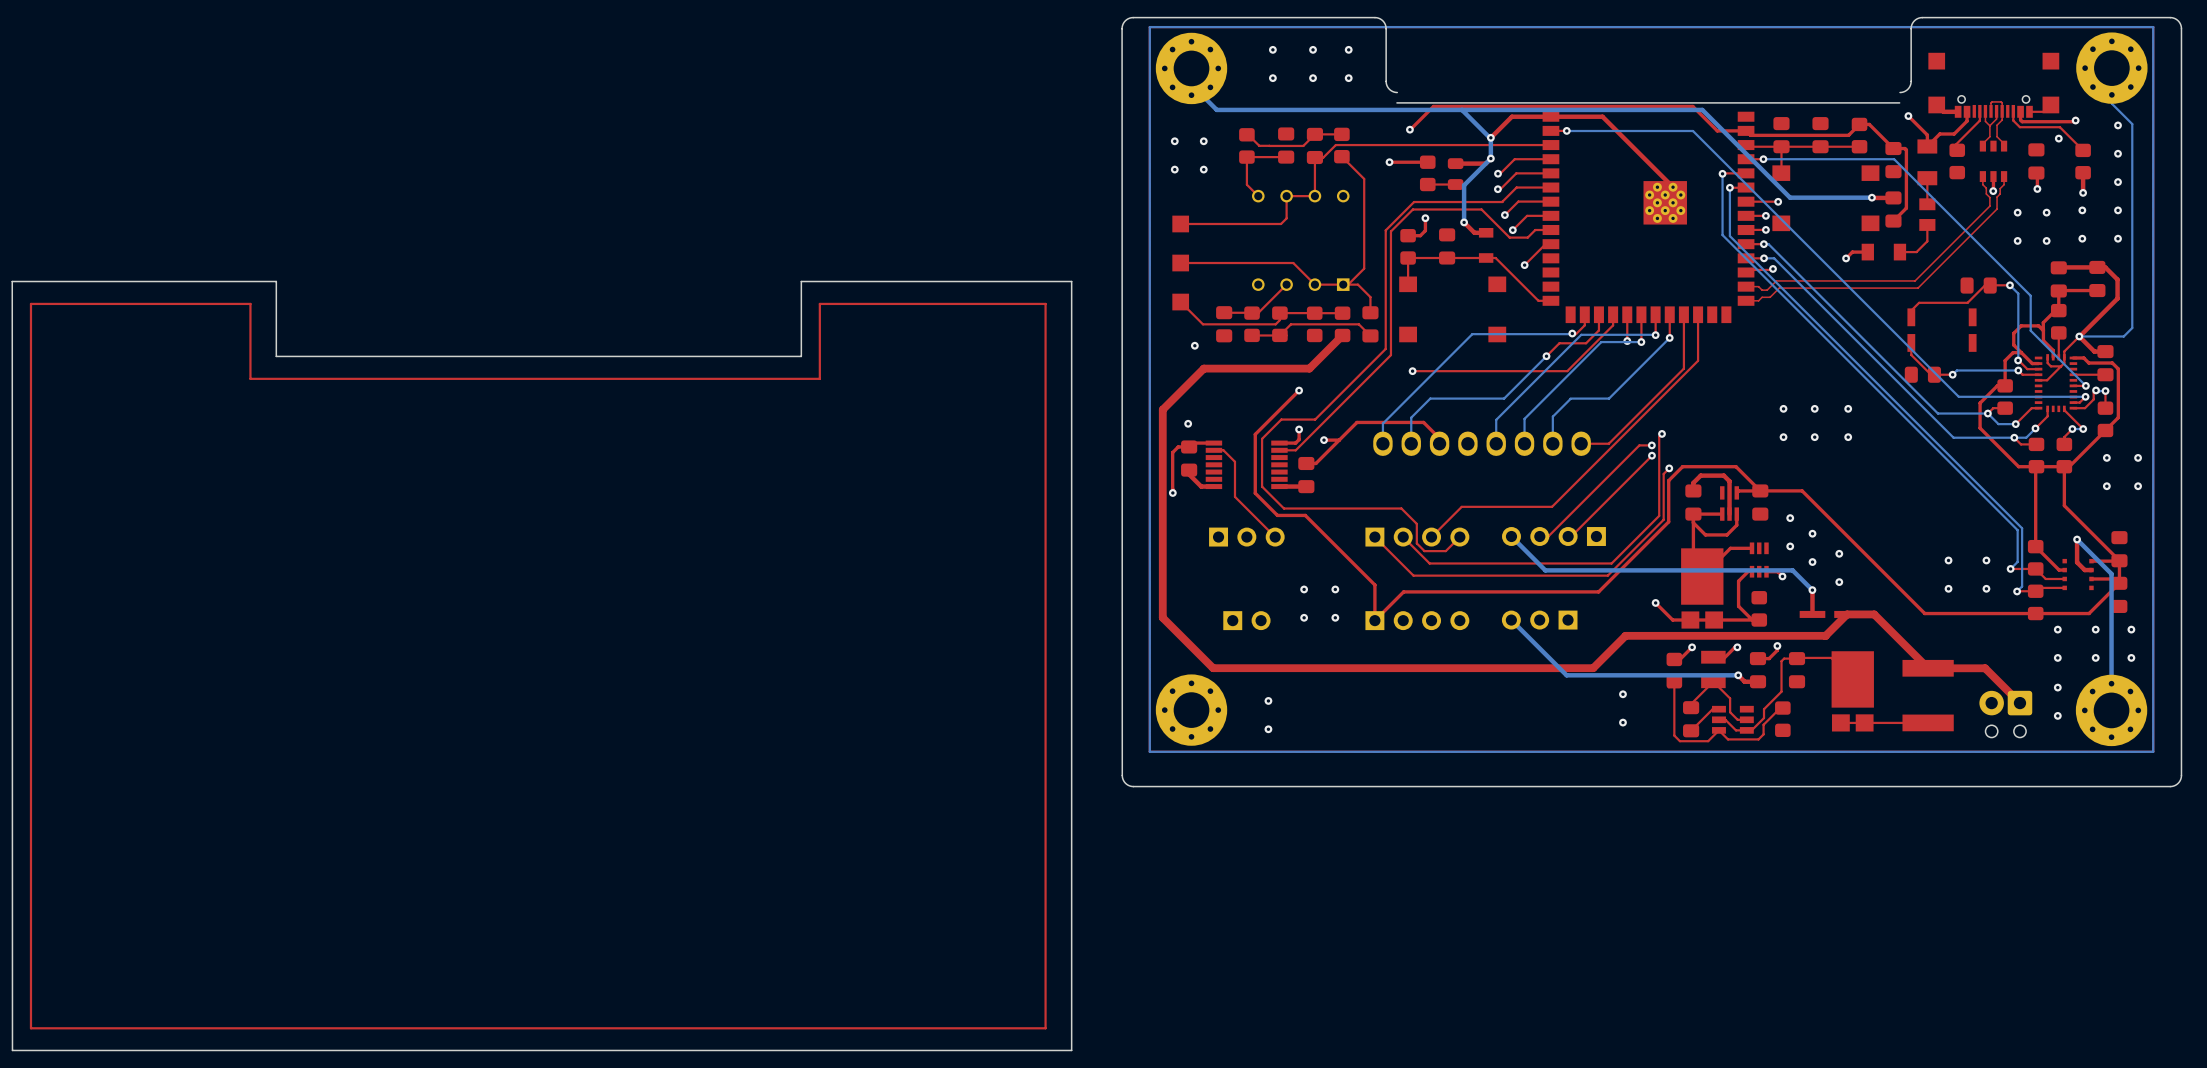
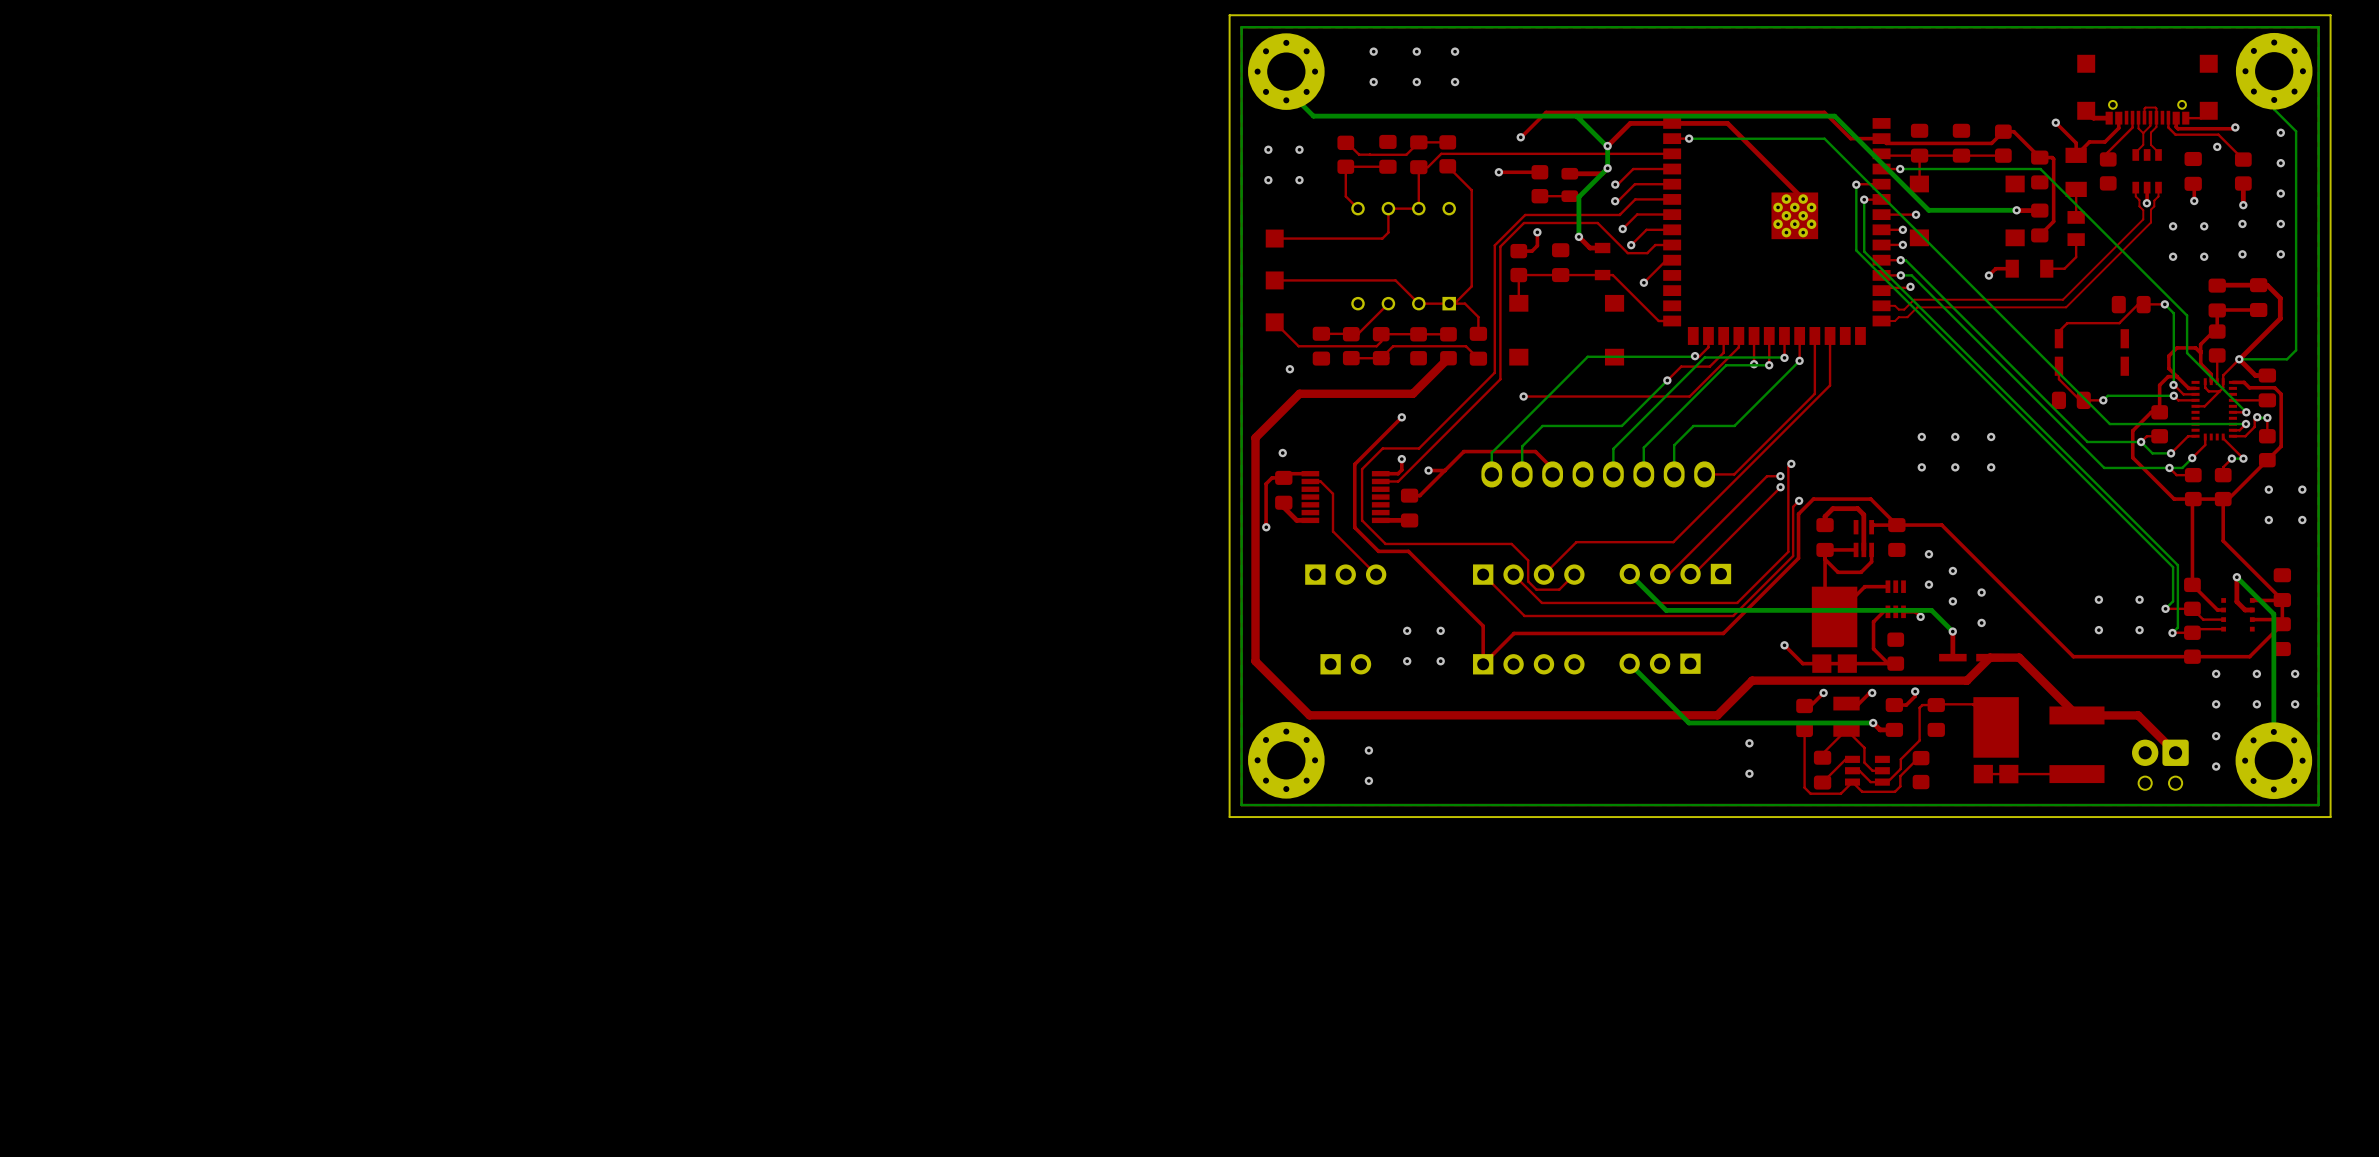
board edge: none -> (2330, 15) (1229, 15) (1229, 817) (2330, 817) (2330, 15)
board edge: (1900, 92) (1906, 90) (1910, 83) (1911, 27) (1913, 21) (1919, 17) (2170, 17) (2176, 19) (2180, 25) (2181, 775) (2179, 781) (2174, 785) (1133, 786) (1125, 783) (1122, 775) (1122, 25) (1126, 20) (1133, 17) (1377, 17) (1383, 21) (1386, 27) (1386, 83) (1390, 90) (1397, 92) -> none
board edge: (1899, 102) (1396, 102) -> none
board edge: (1071, 281) (801, 281) (801, 356) (276, 356) (276, 281) (12, 281) (12, 1050) (1071, 1050) (1071, 281) -> none
top track: (1045, 303) (819, 303) (819, 378) (250, 378) (250, 303) (30, 303) (30, 1028) (1045, 1028) (1045, 303) -> none

